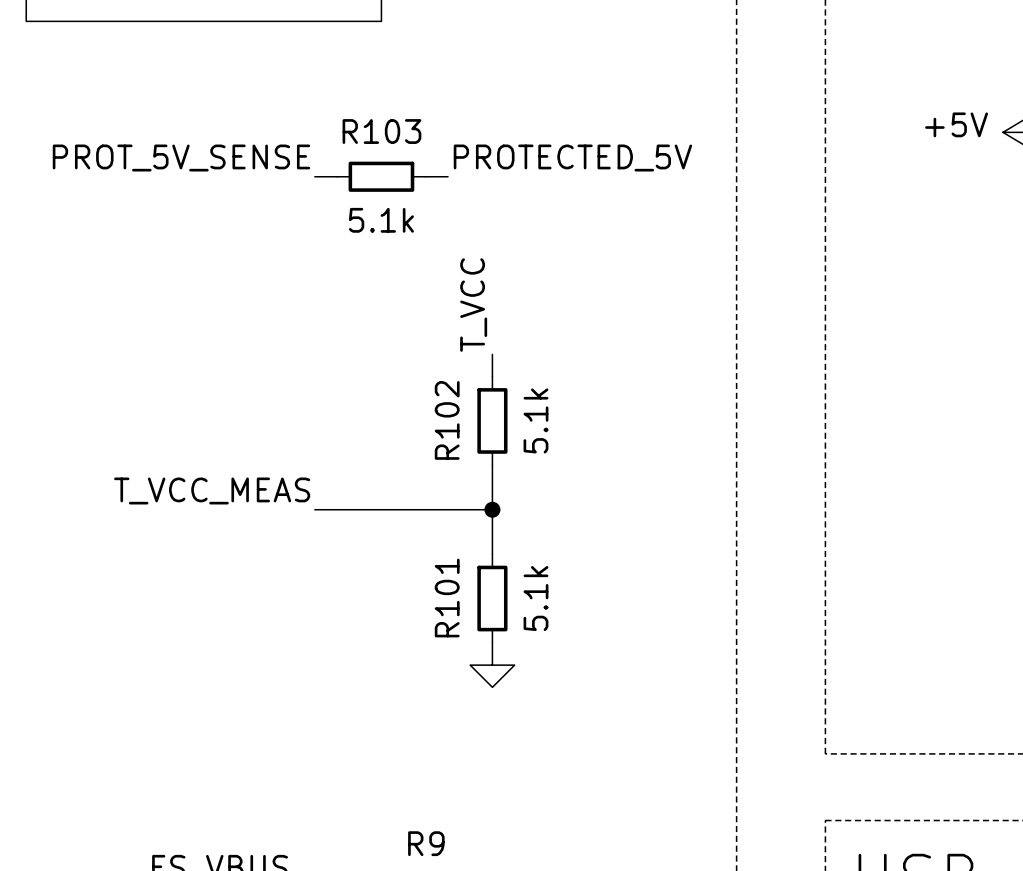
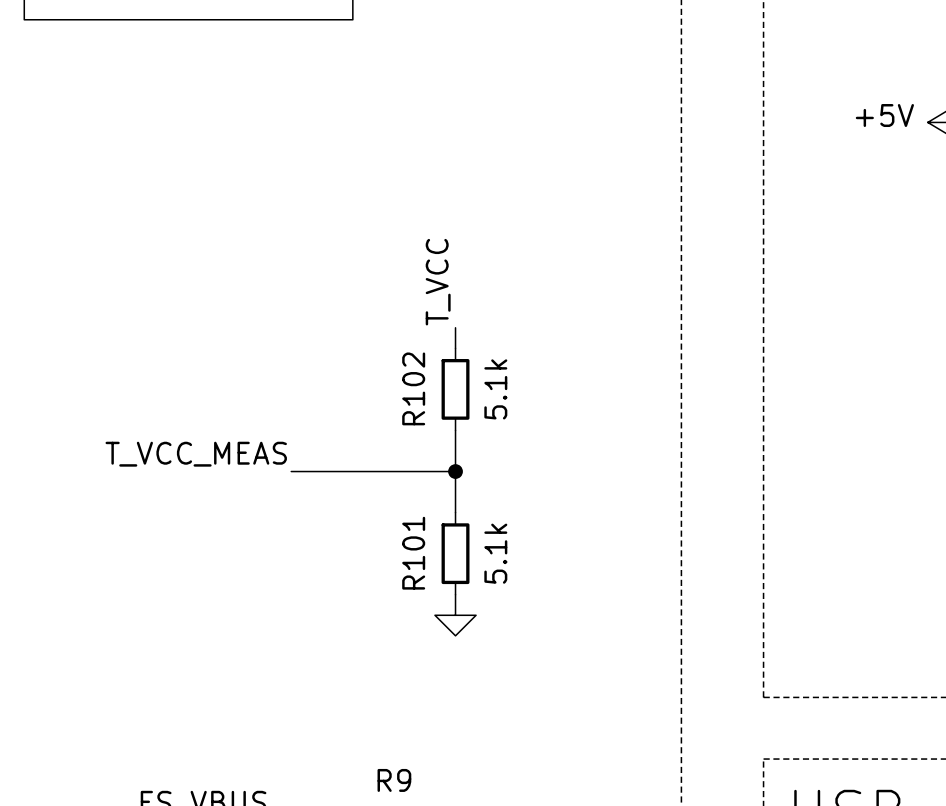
label: PROT_5V_SENSE (181, 158) -> none
label: PROTECTED_5V (572, 158) -> none
wire: (314, 176) (337, 176) -> none
R103: 5.1k (381, 176) -> none
wire: (425, 176) (448, 176) -> none

